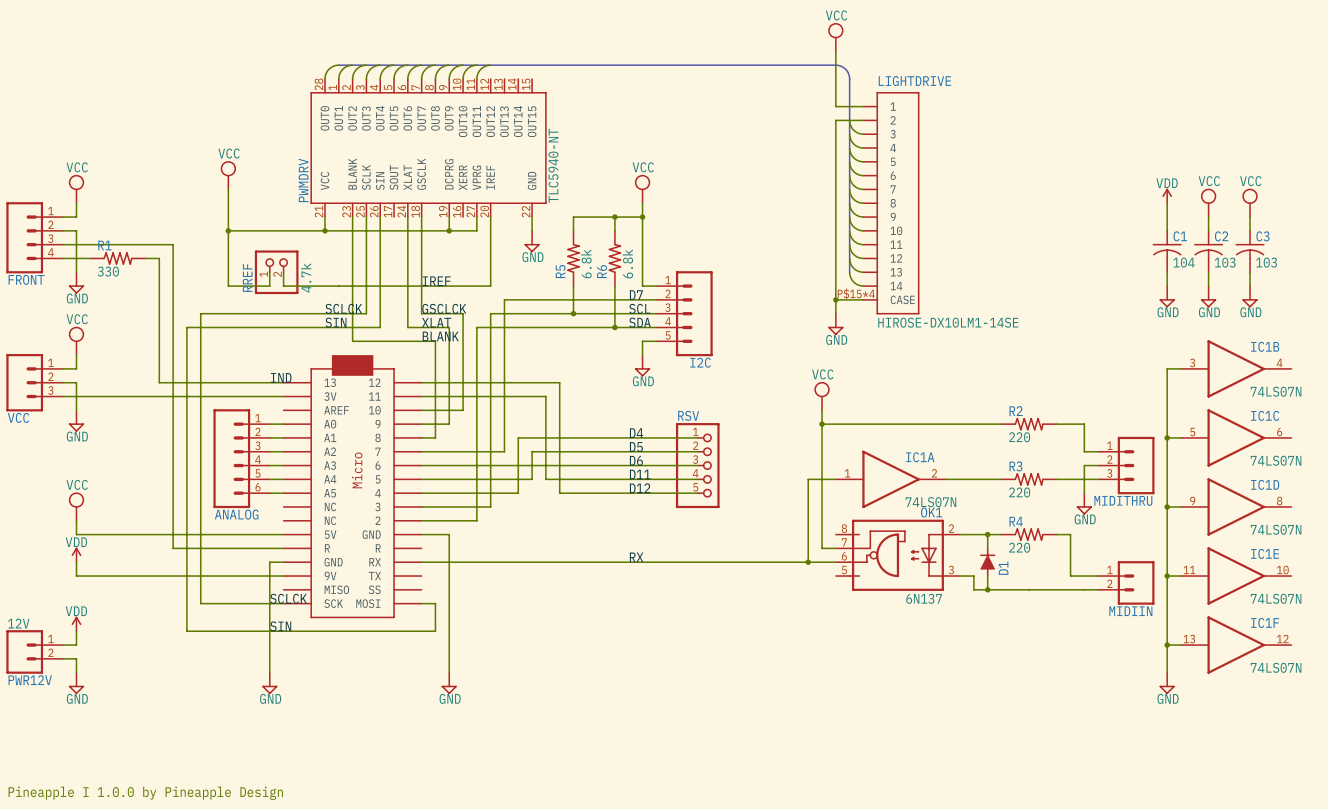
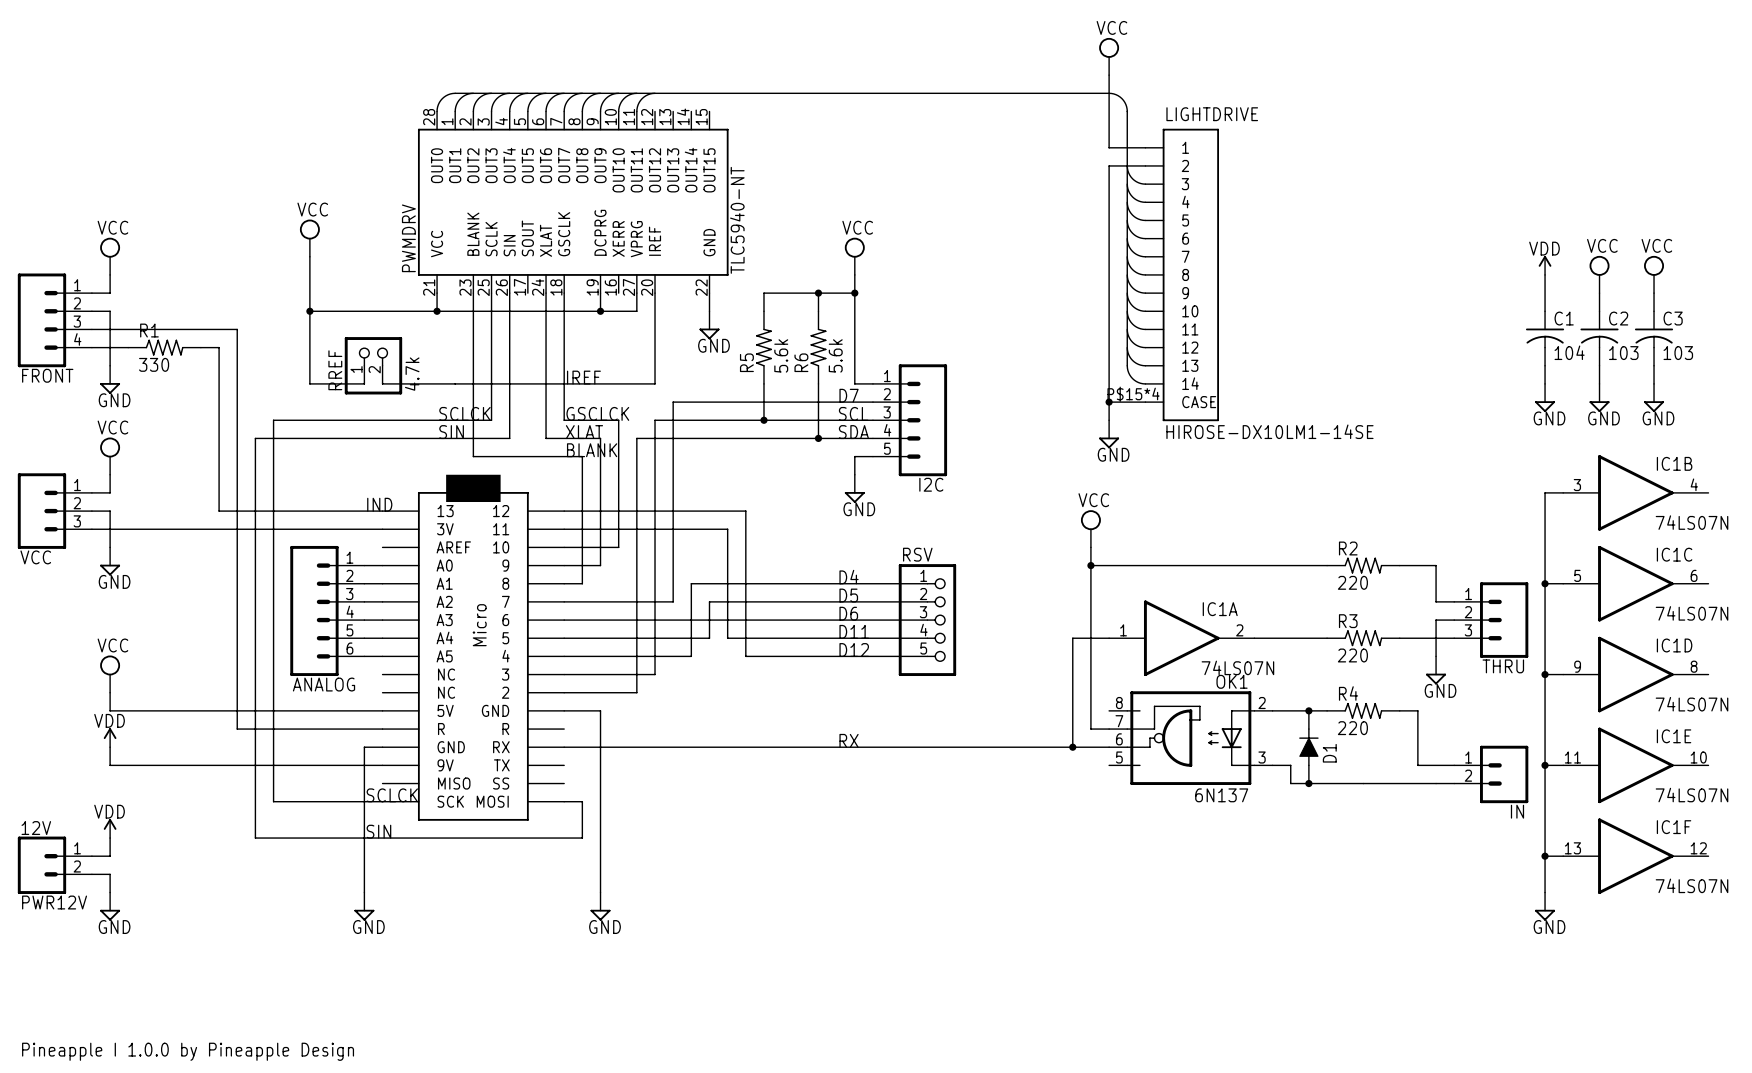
R5 value: 6.8k (586, 263) -> 5.6k (781, 355)
R6 value: 6.8k (627, 263) -> 5.6k (835, 355)
MIDITHRU name: MIDITHRU (1123, 500) -> THRU (1503, 666)
MIDIIN name: MIDIIN (1130, 611) -> IN (1517, 811)

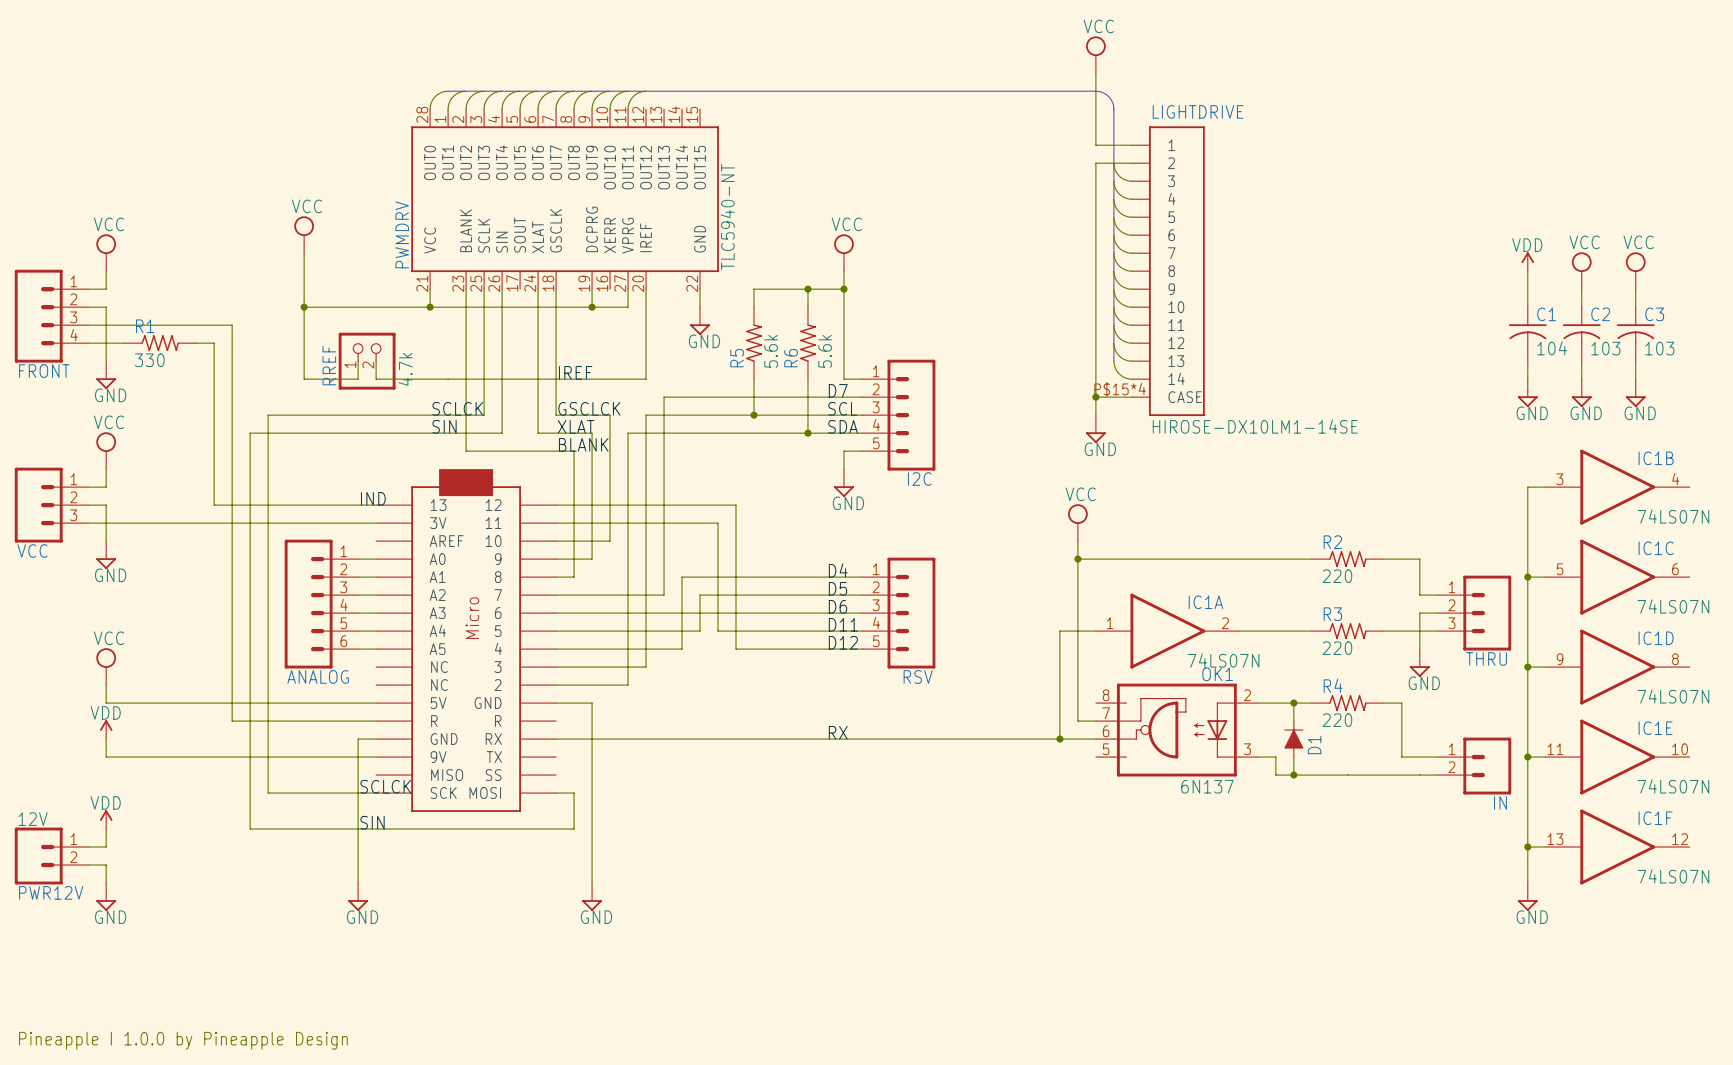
RSV: none -> (898, 613)
RSV: (927, 620) -> none

